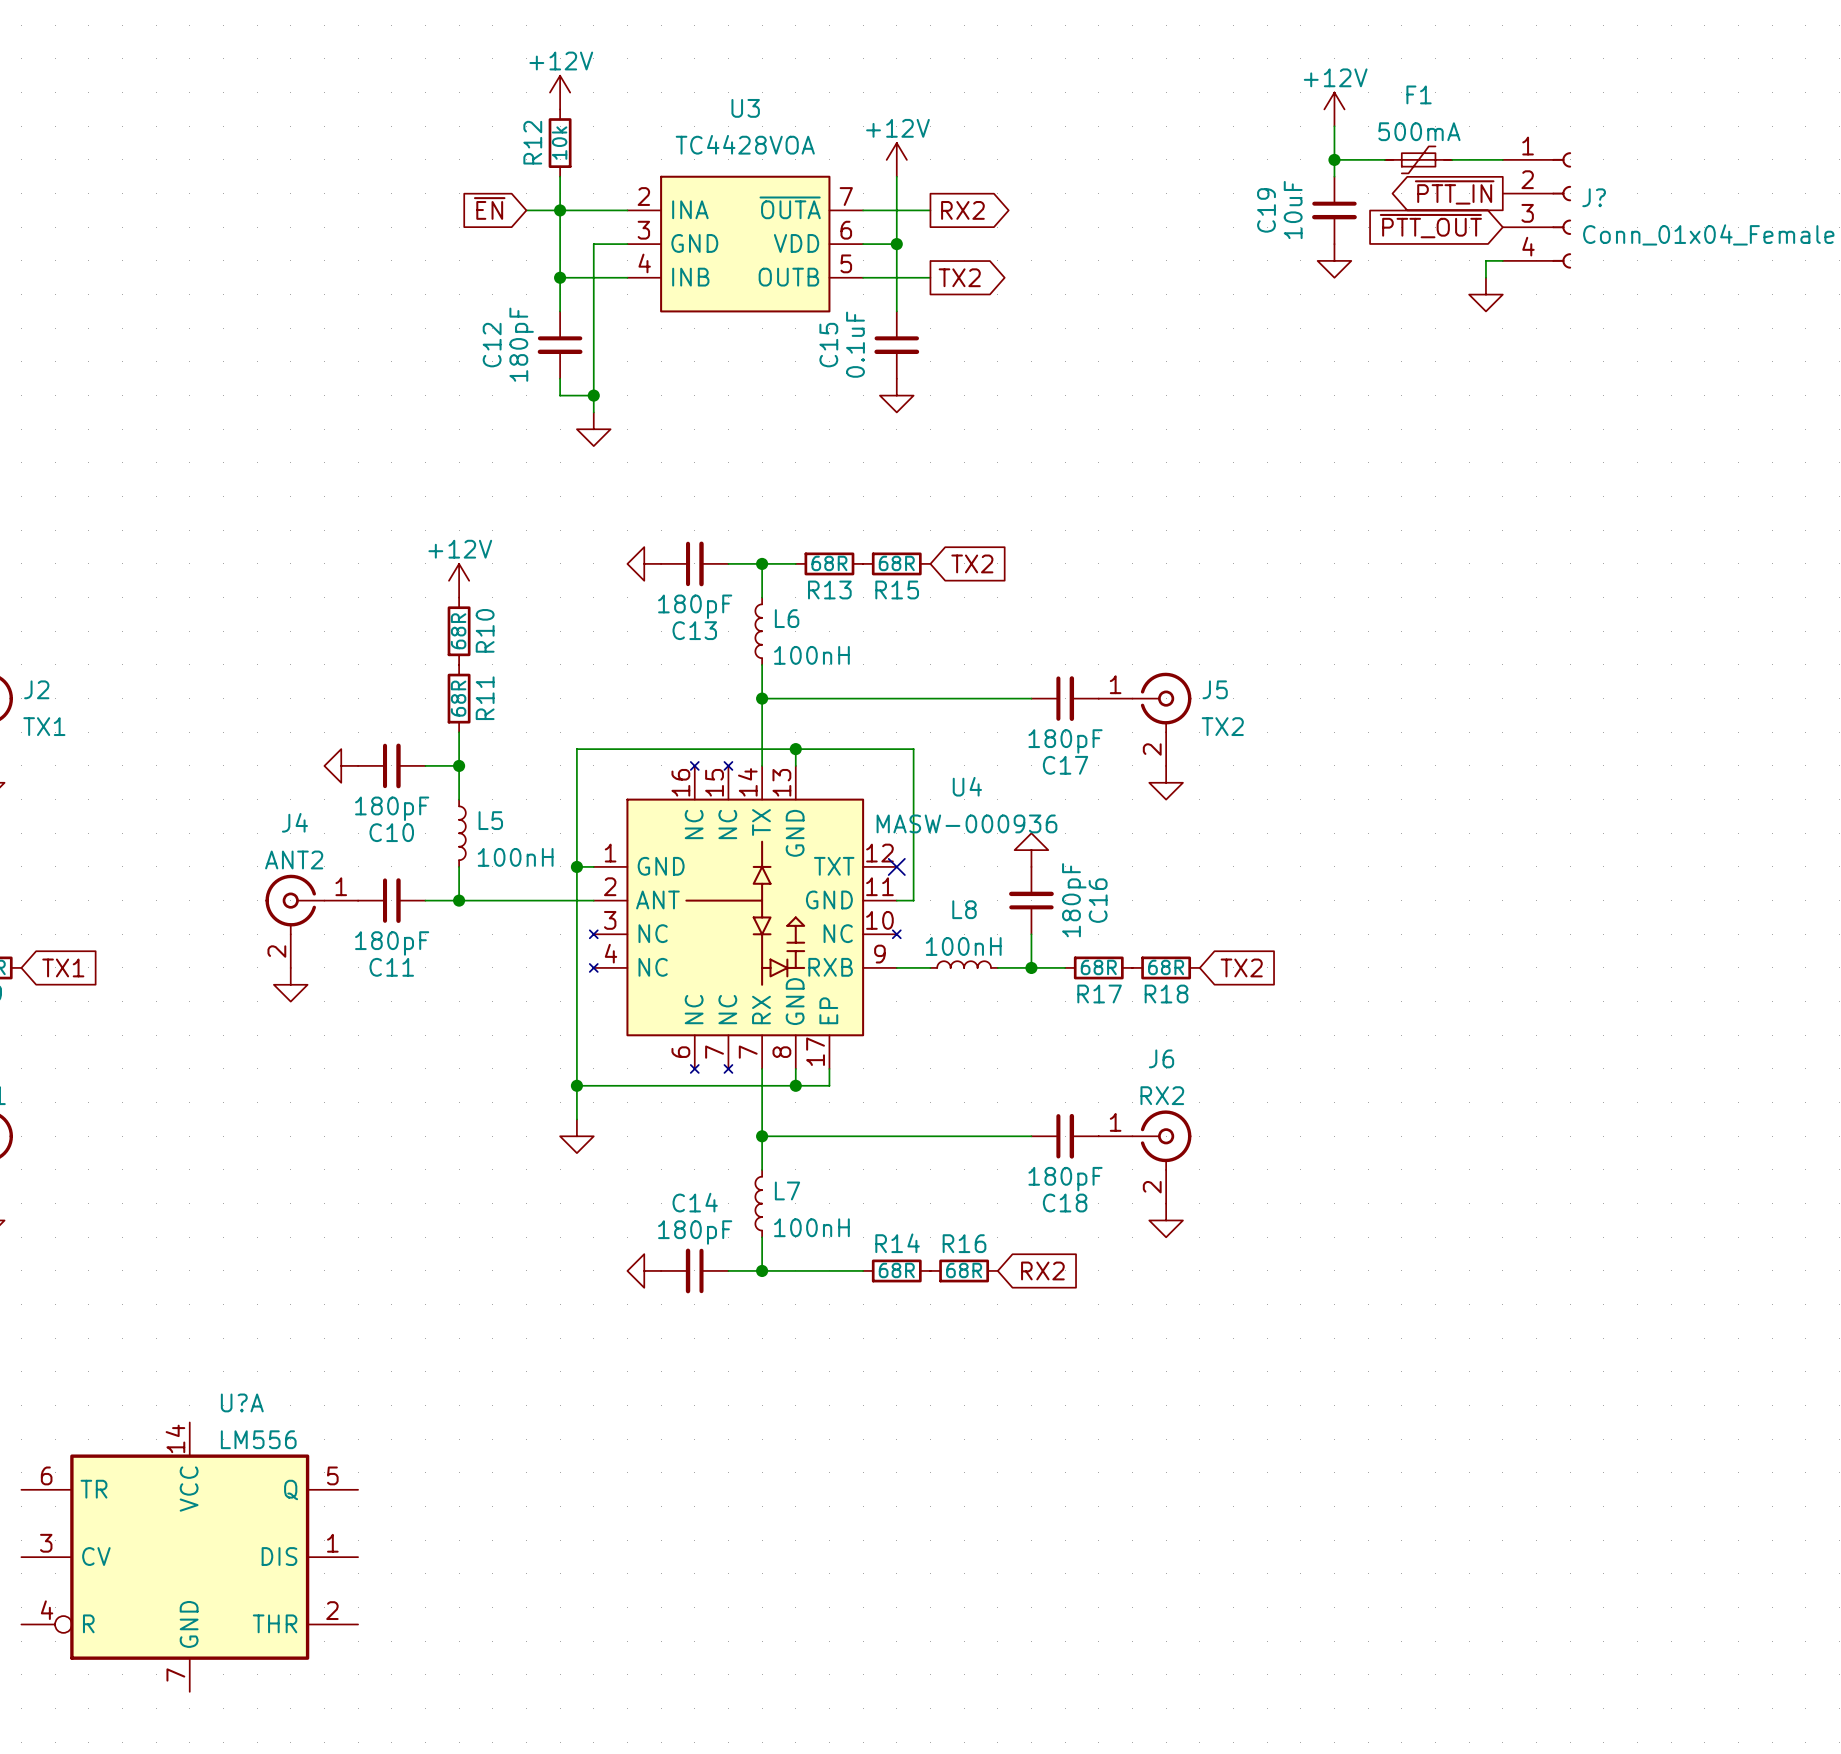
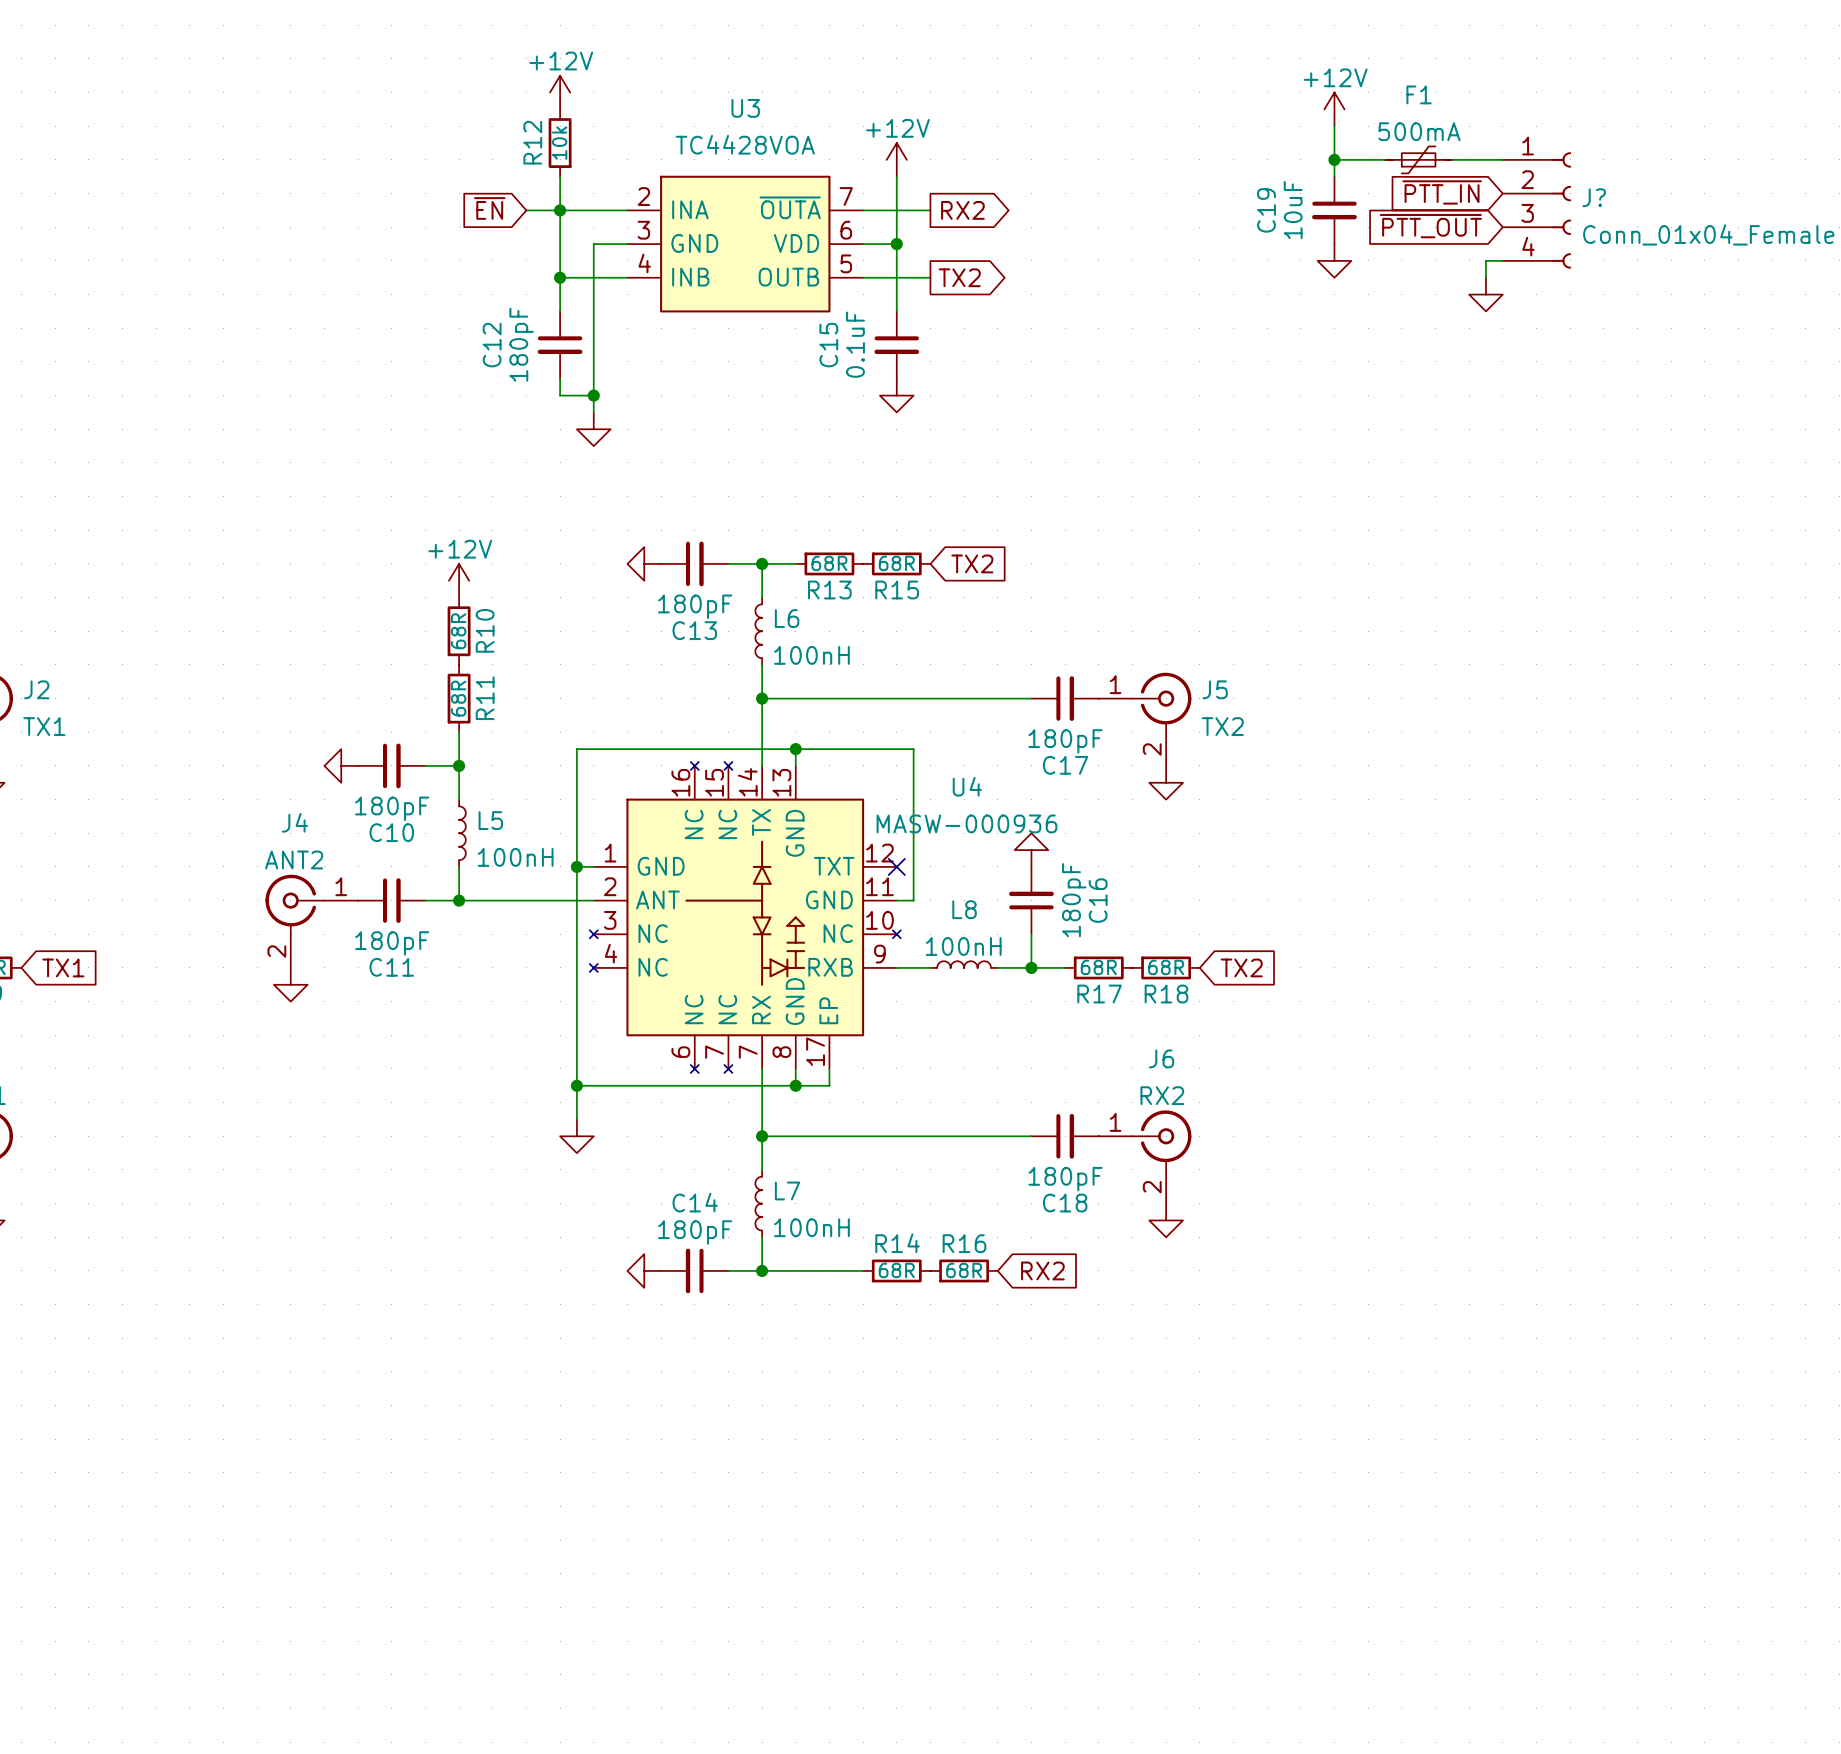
global label shape: output (1454, 192) -> input (1442, 192)
U?A: LM556 (189, 1557) -> none

